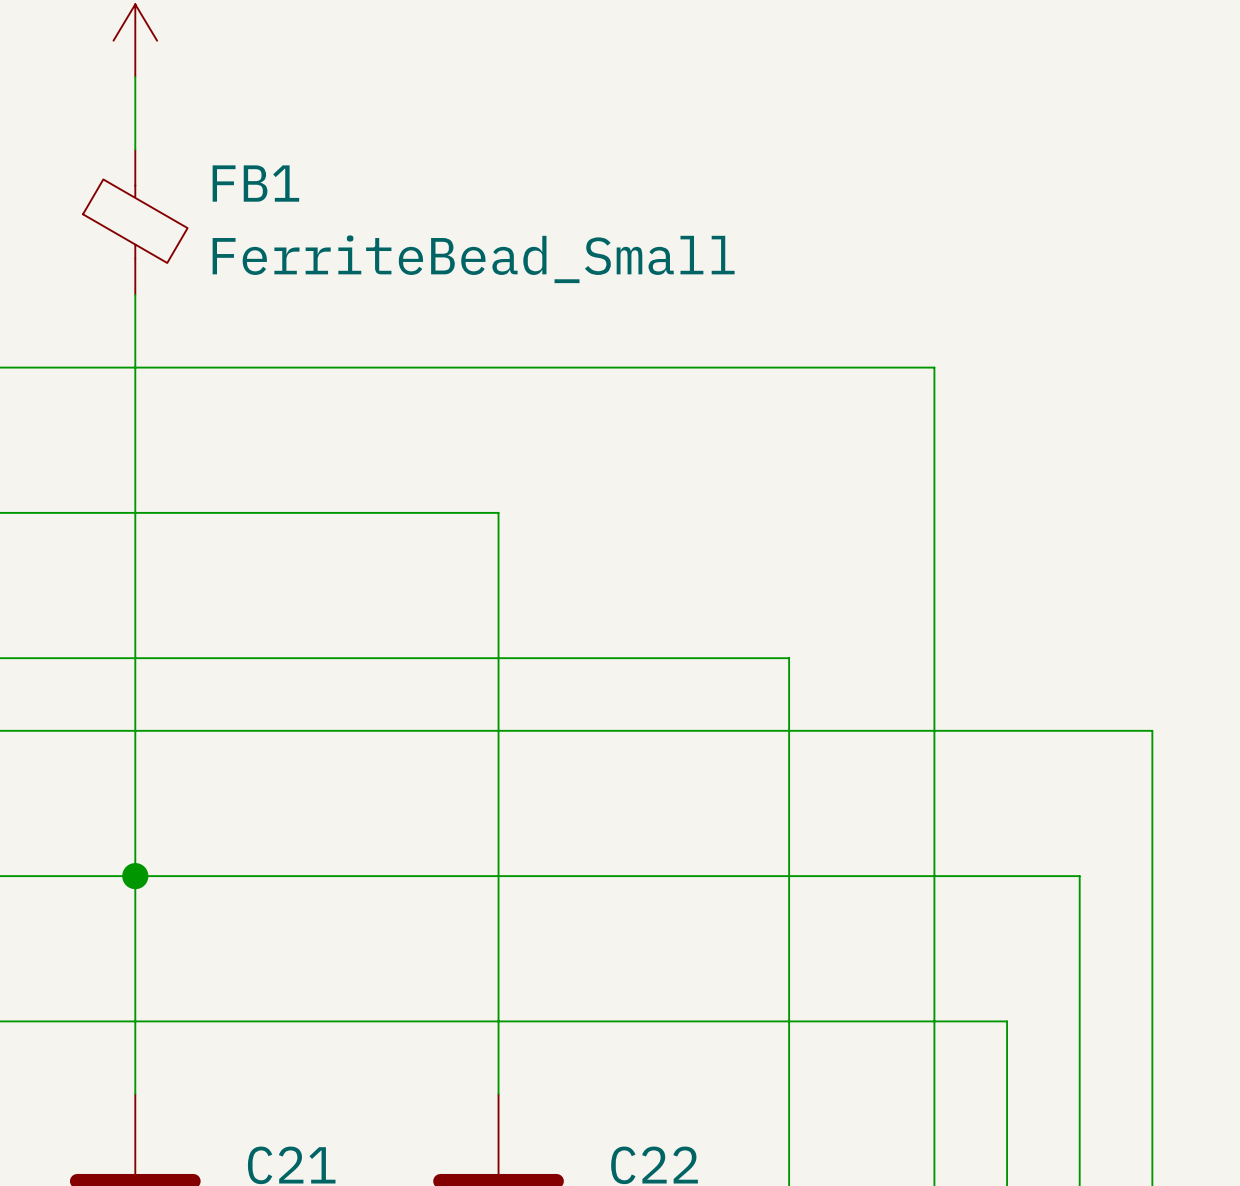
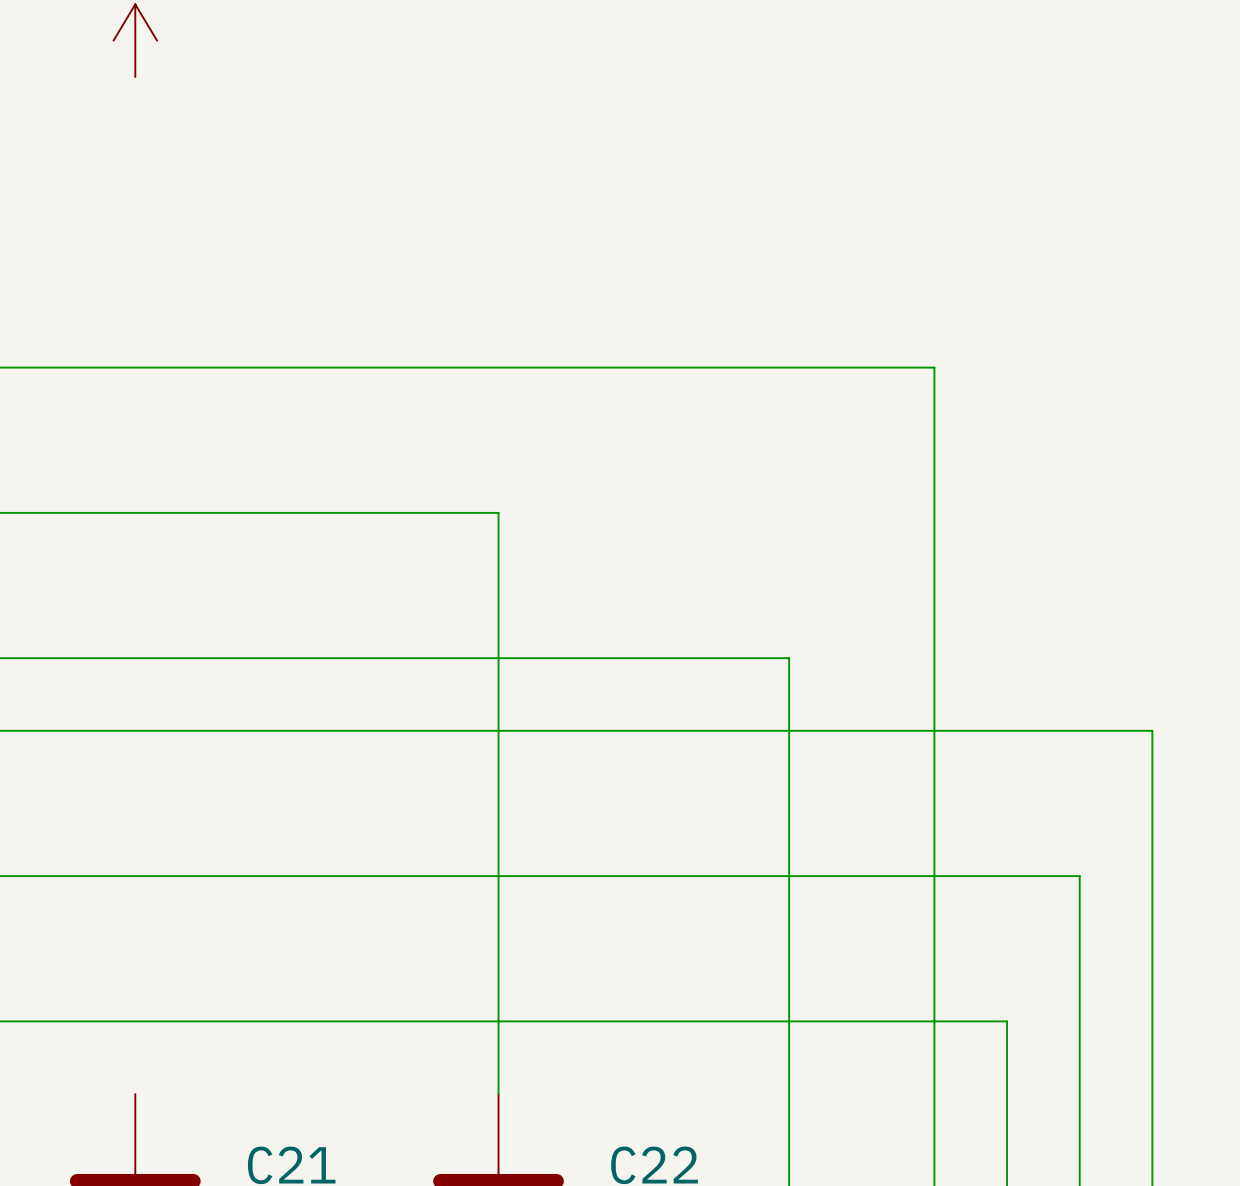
wire: (135, 77) (135, 149) -> none
FB1: FerriteBead_Small (135, 222) -> none
wire: (135, 294) (135, 1094) -> none
junction: (135, 876) -> none

